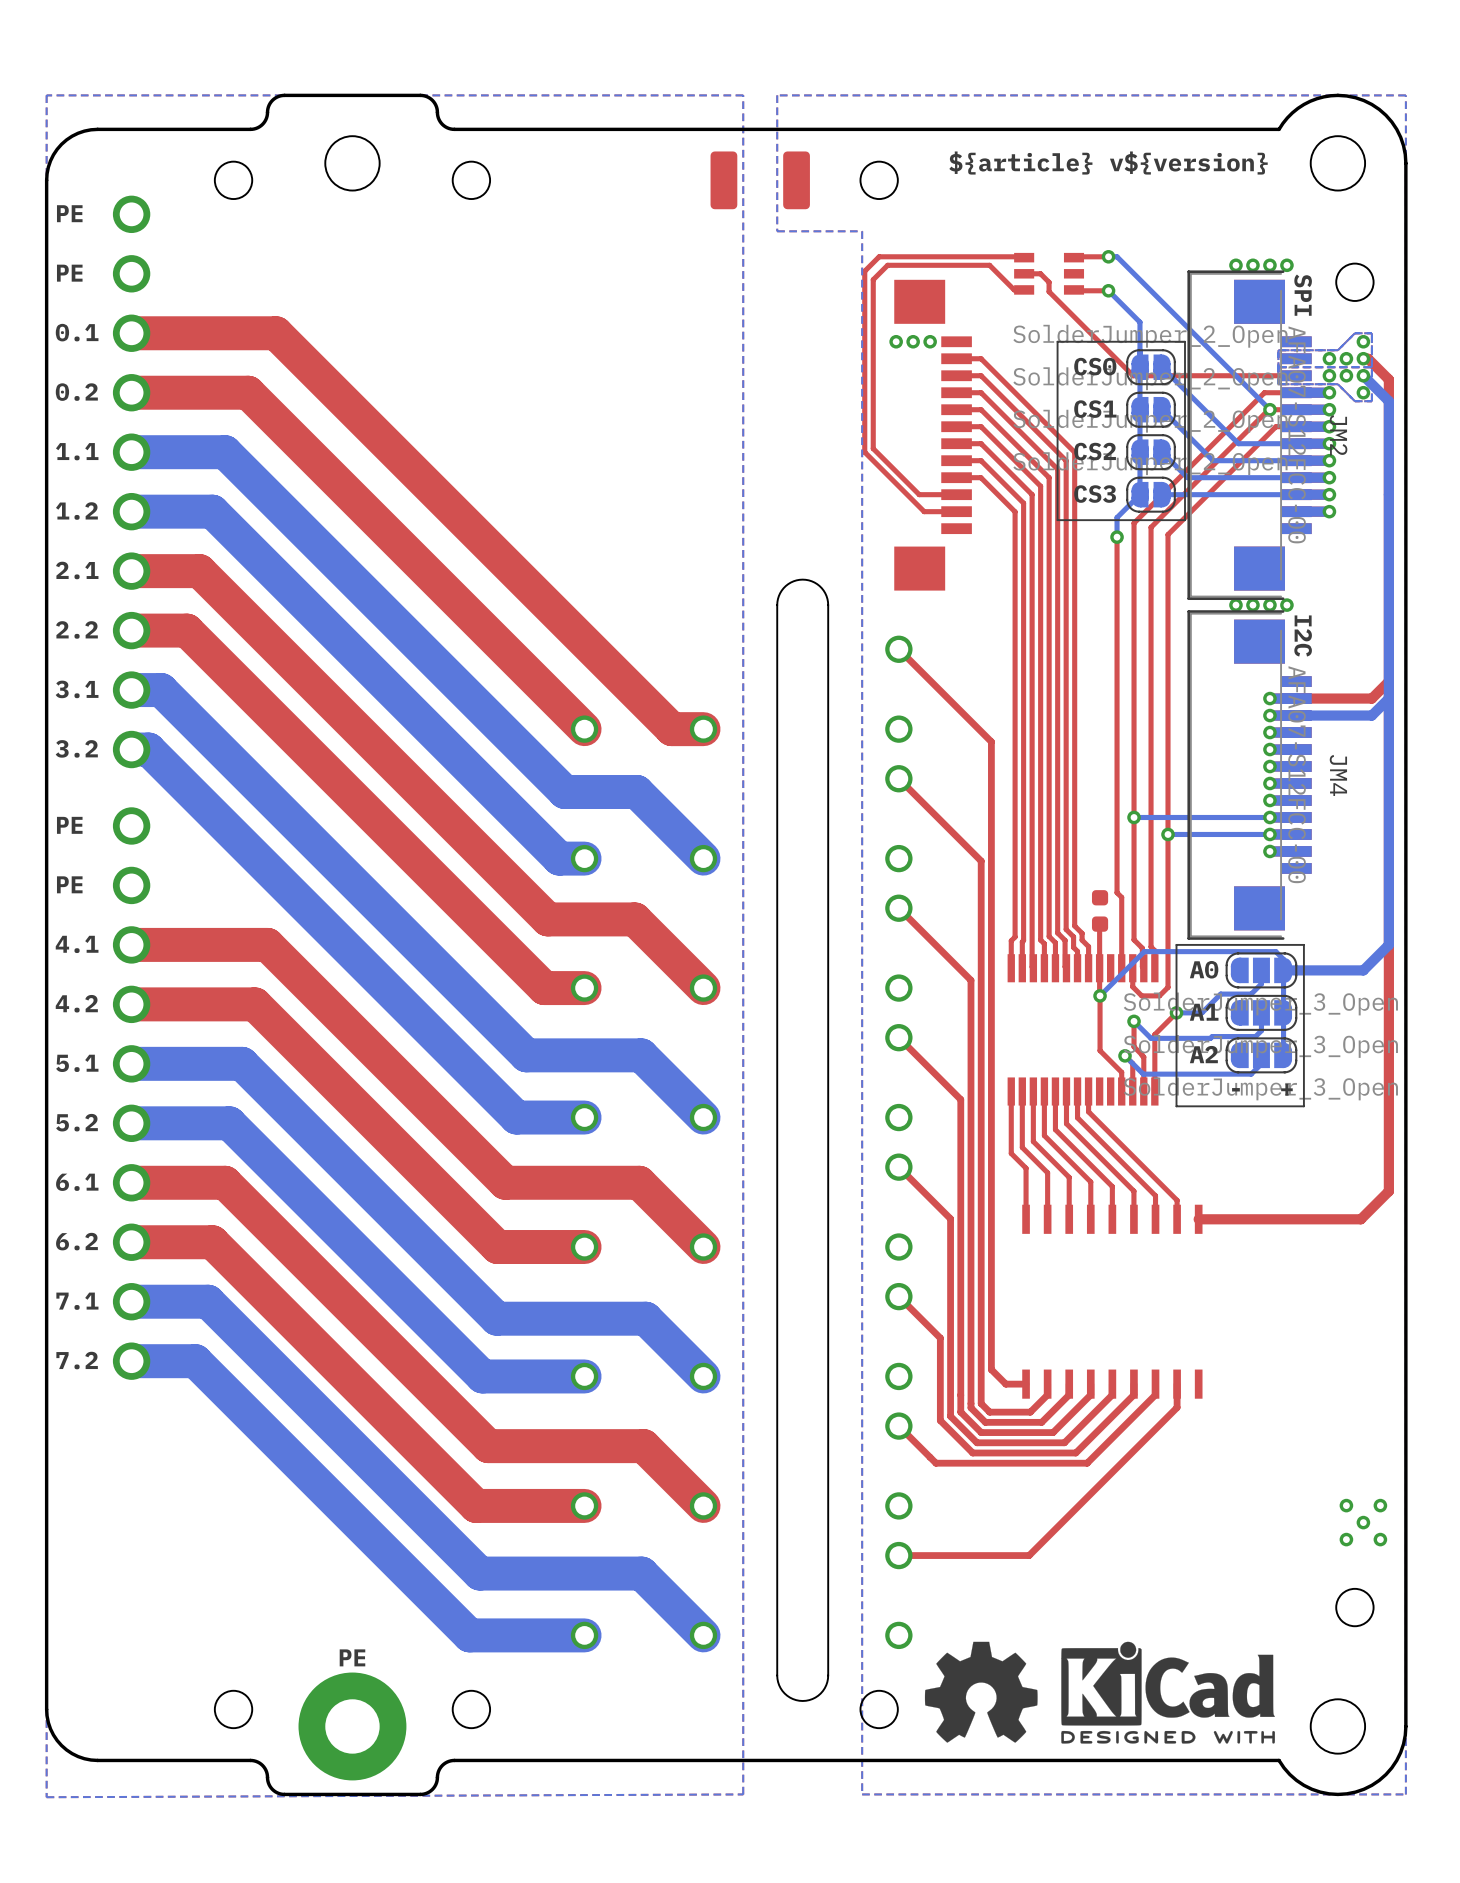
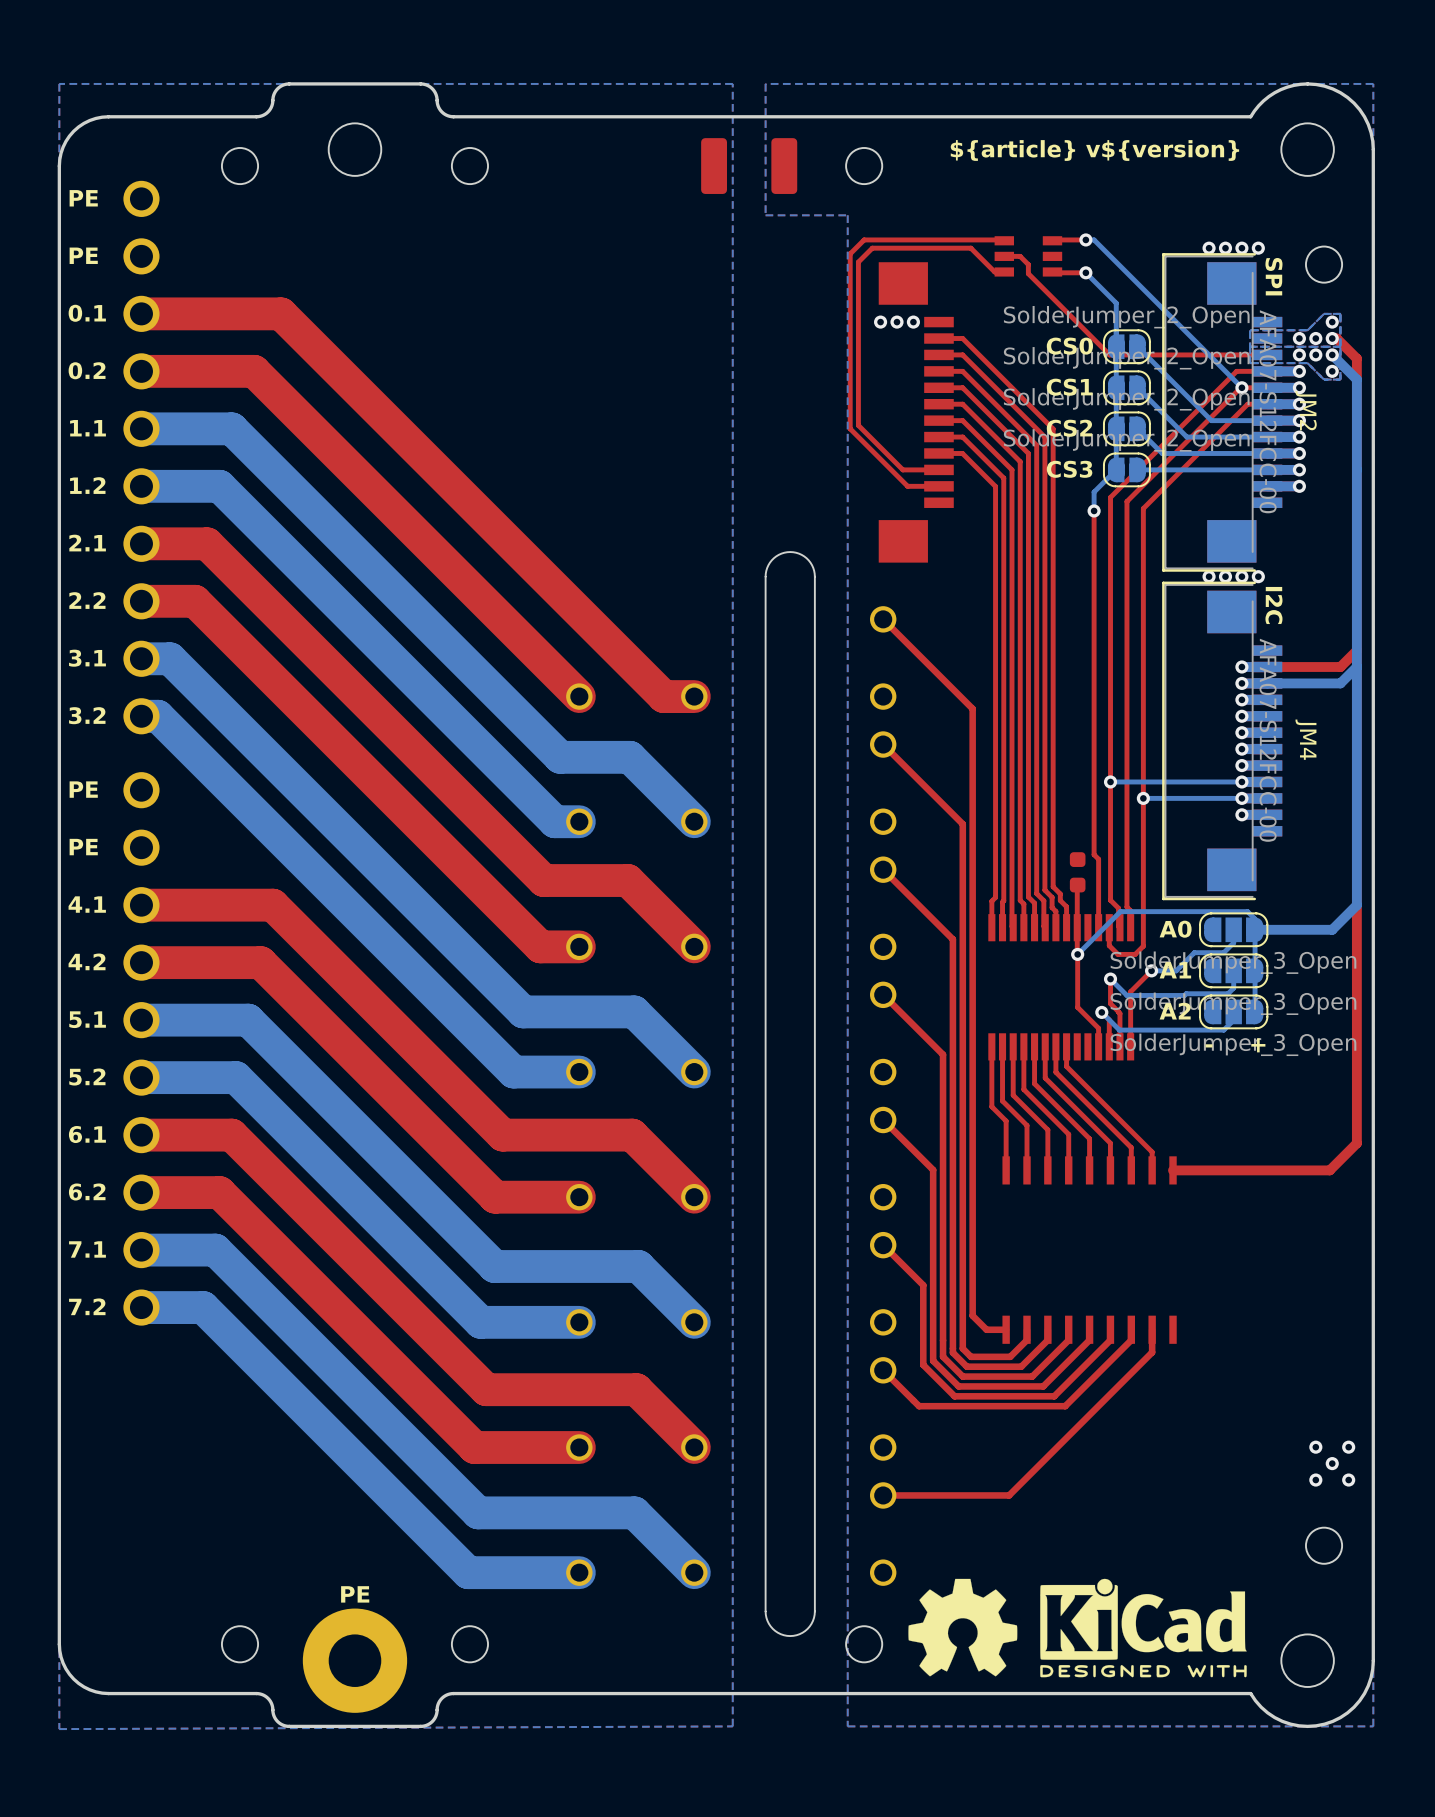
line: (1185, 341) (1057, 341) (1057, 520) (1185, 520) (1185, 341) -> none
line: (1303, 944) (1176, 944) (1176, 1106) (1303, 1106) (1303, 944) -> none

